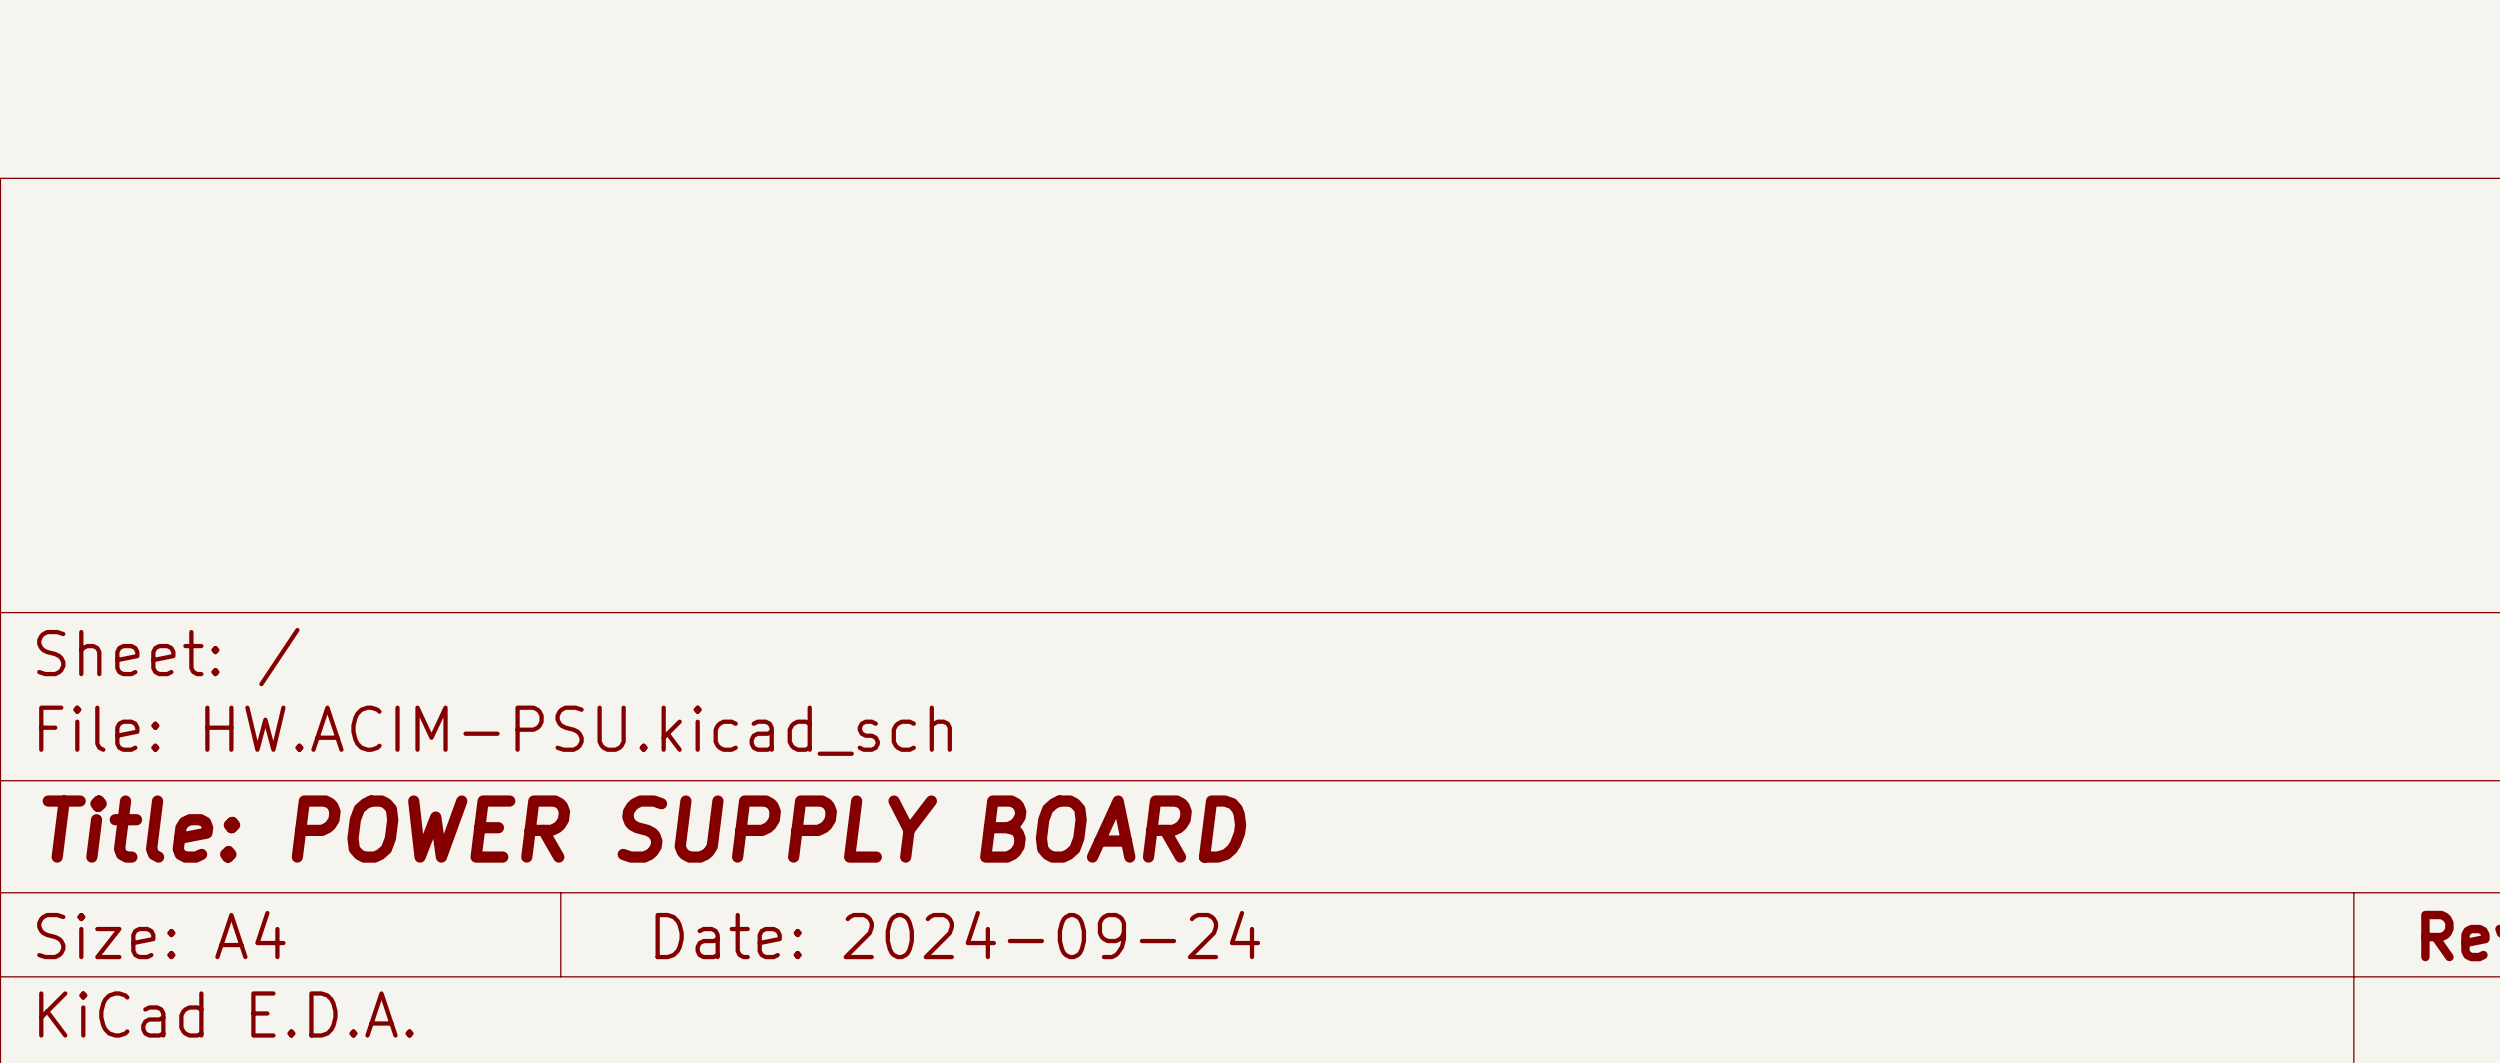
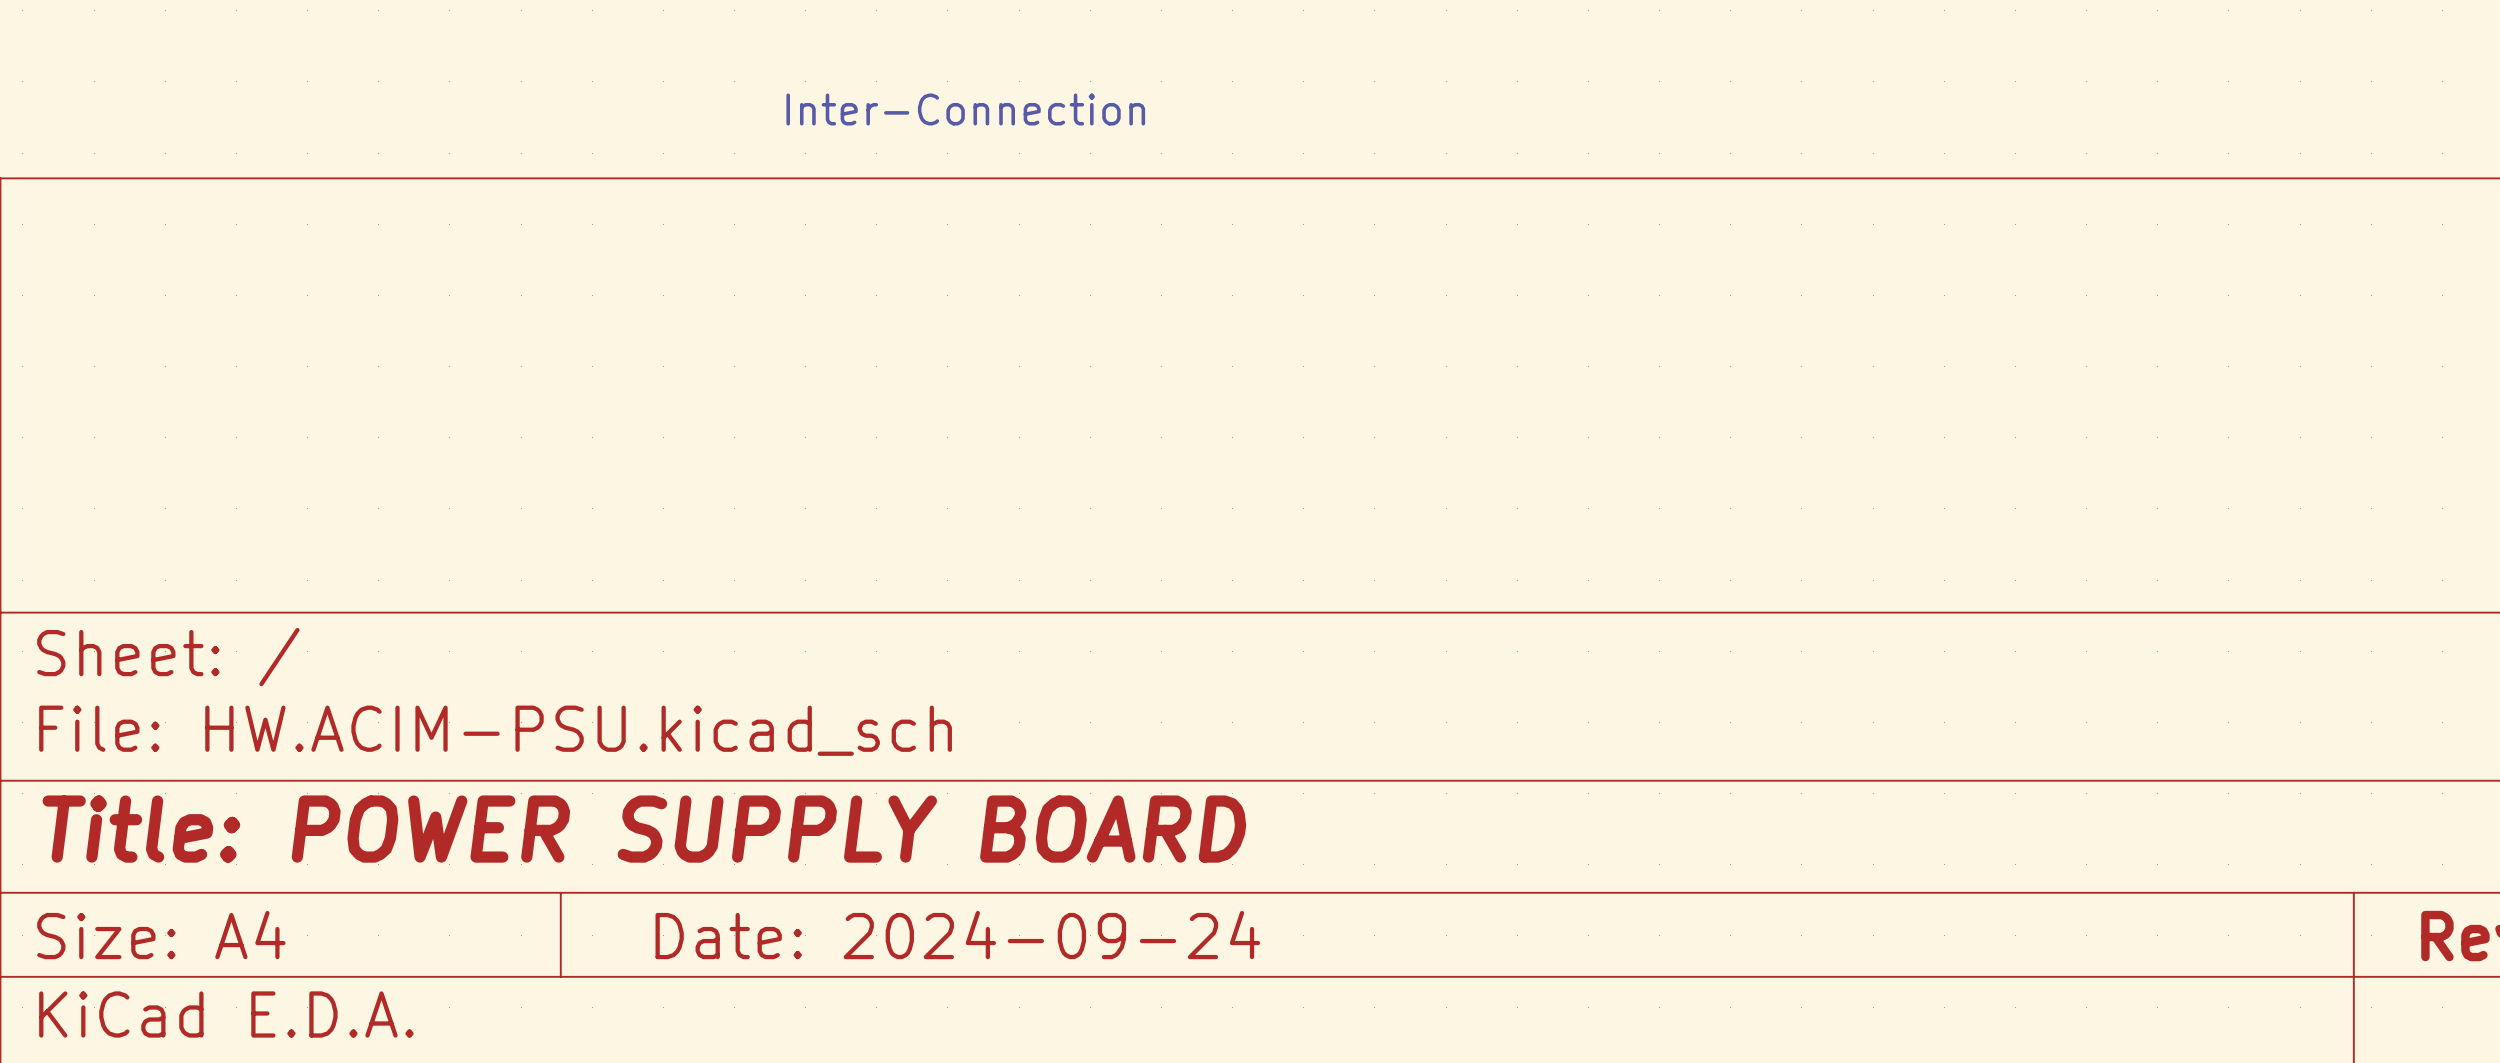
text: none -> Inter-Connection (965, 109)

